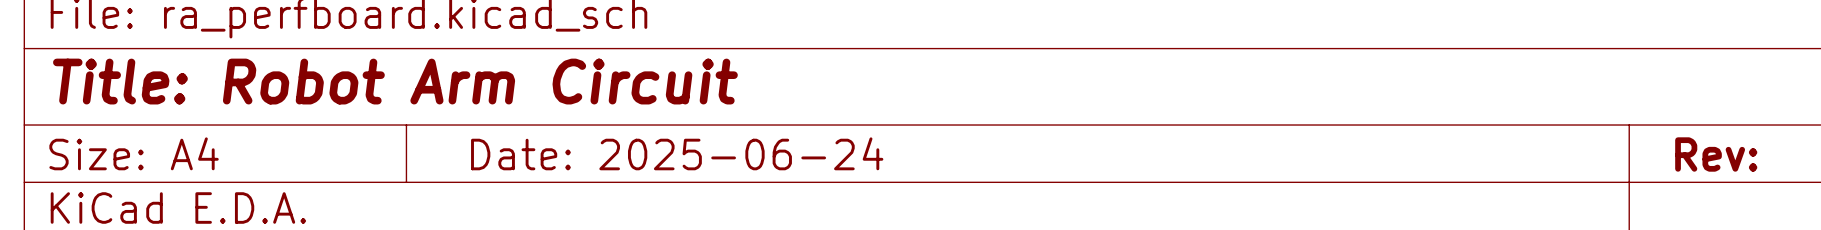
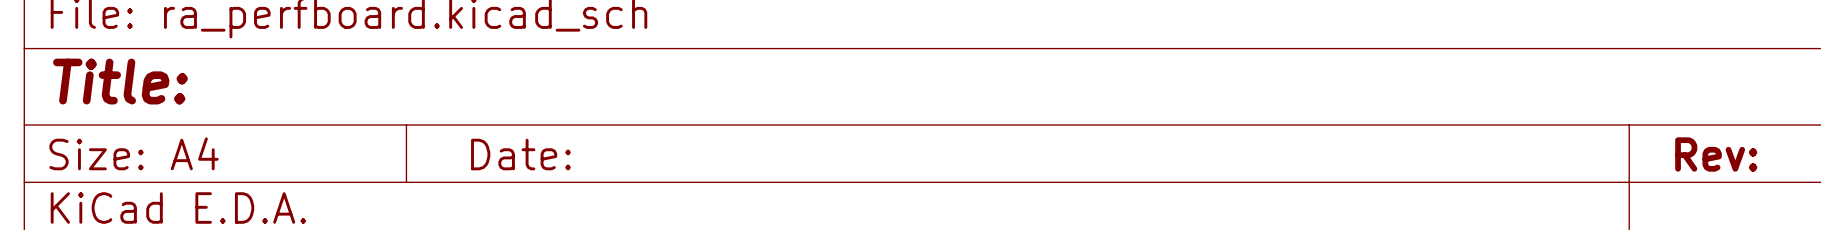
title block: Title: Robot Arm Circuit (395, 81) -> Title: (120, 81)
title block: Date: 2025-06-24 (677, 153) -> Date: (520, 154)

